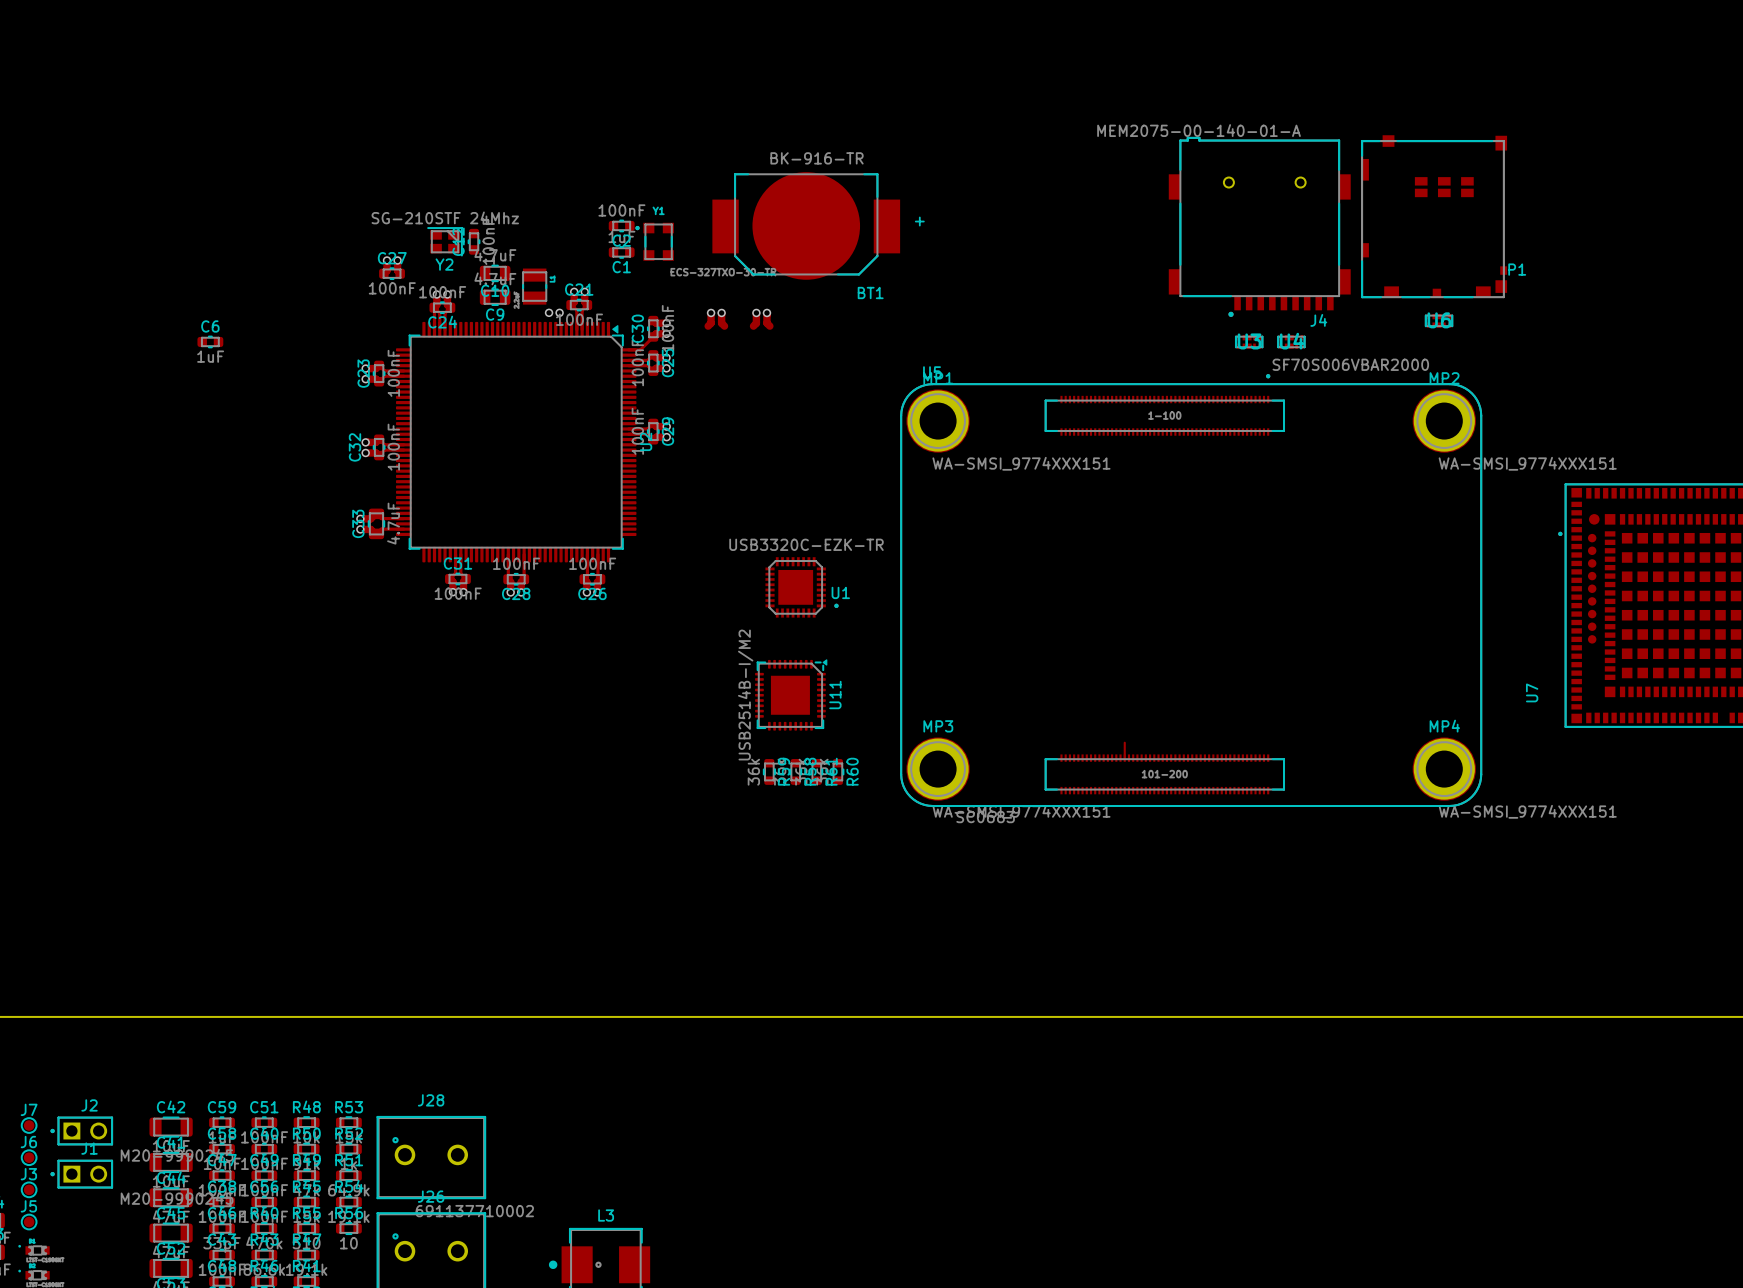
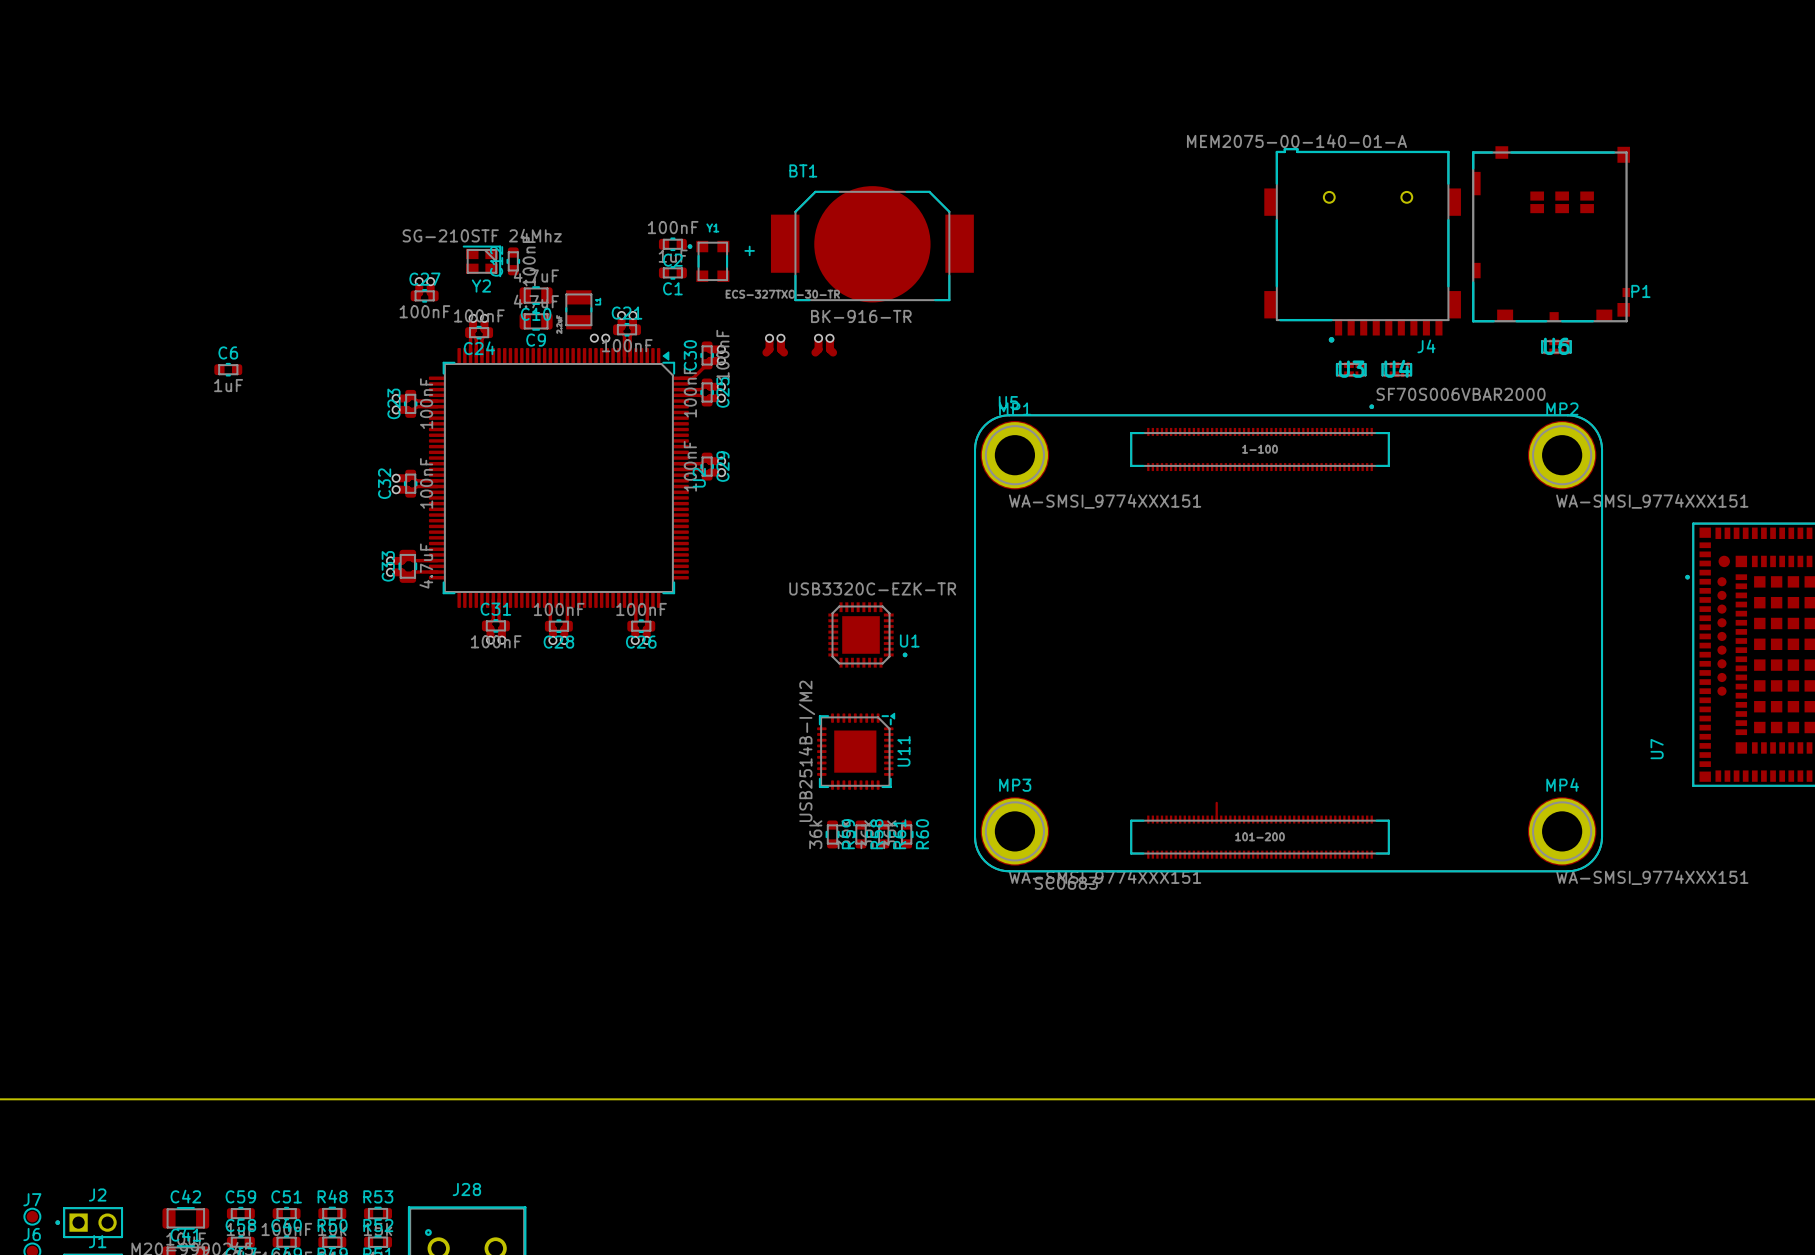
BT1 rotation: 0° (806, 225) -> 180° (872, 244)

